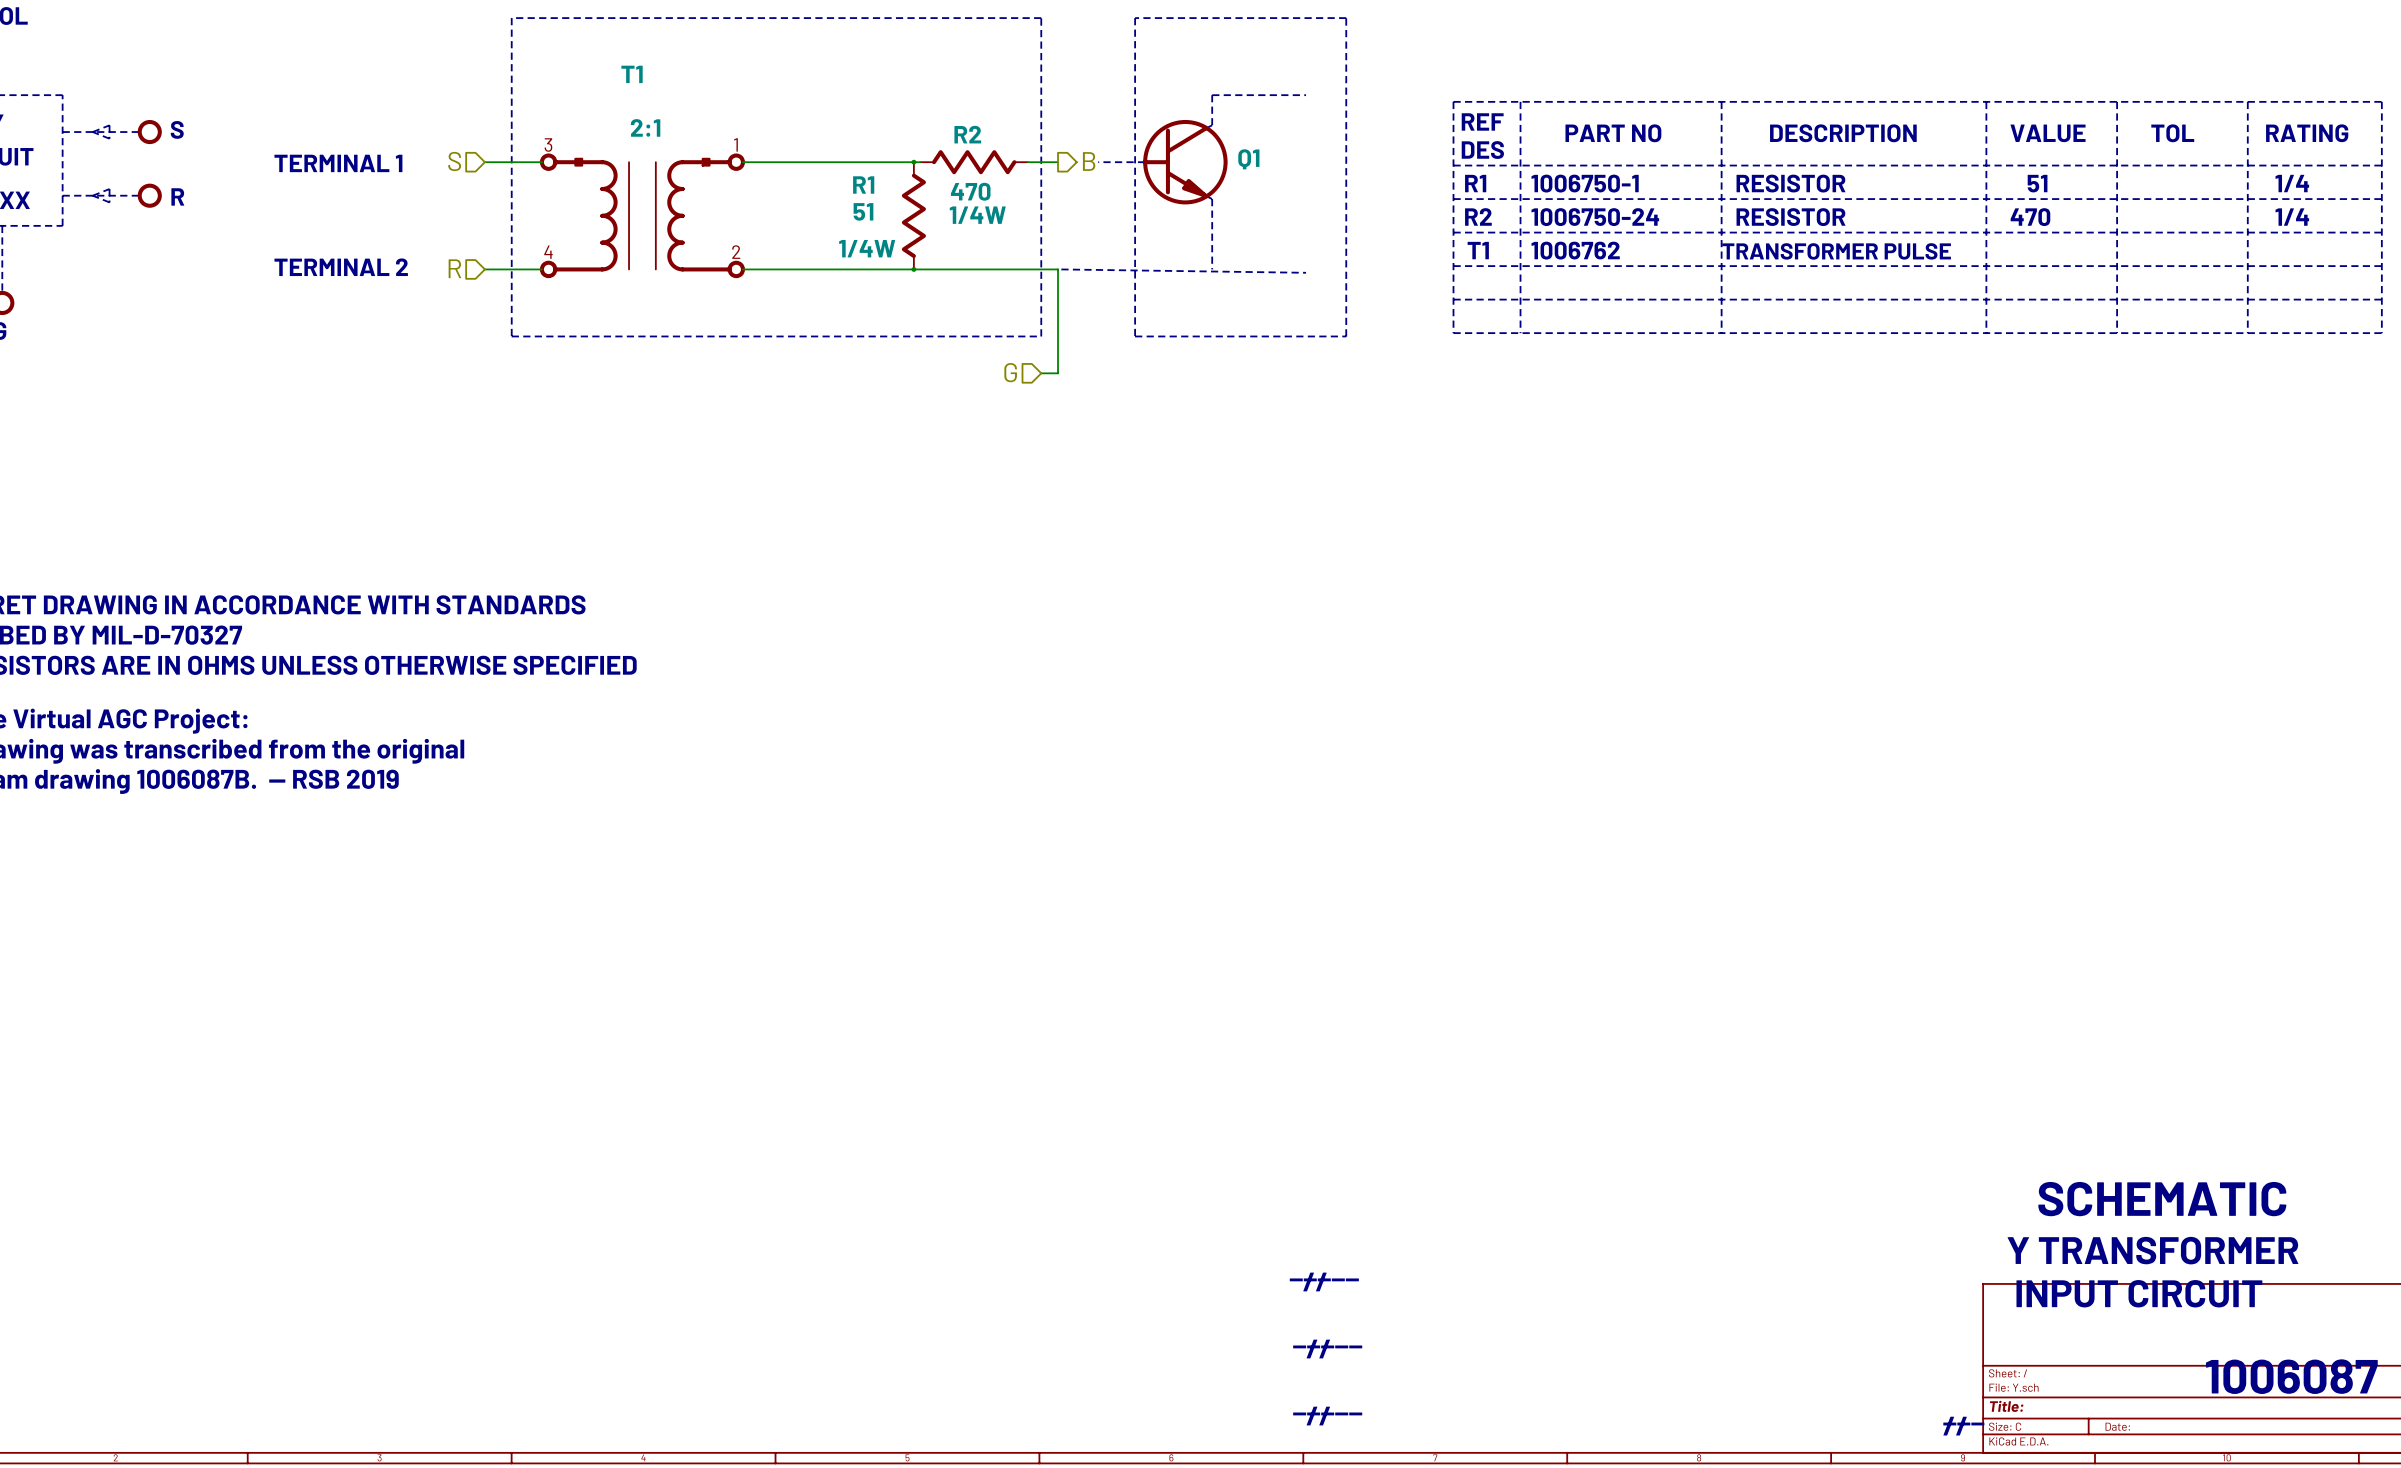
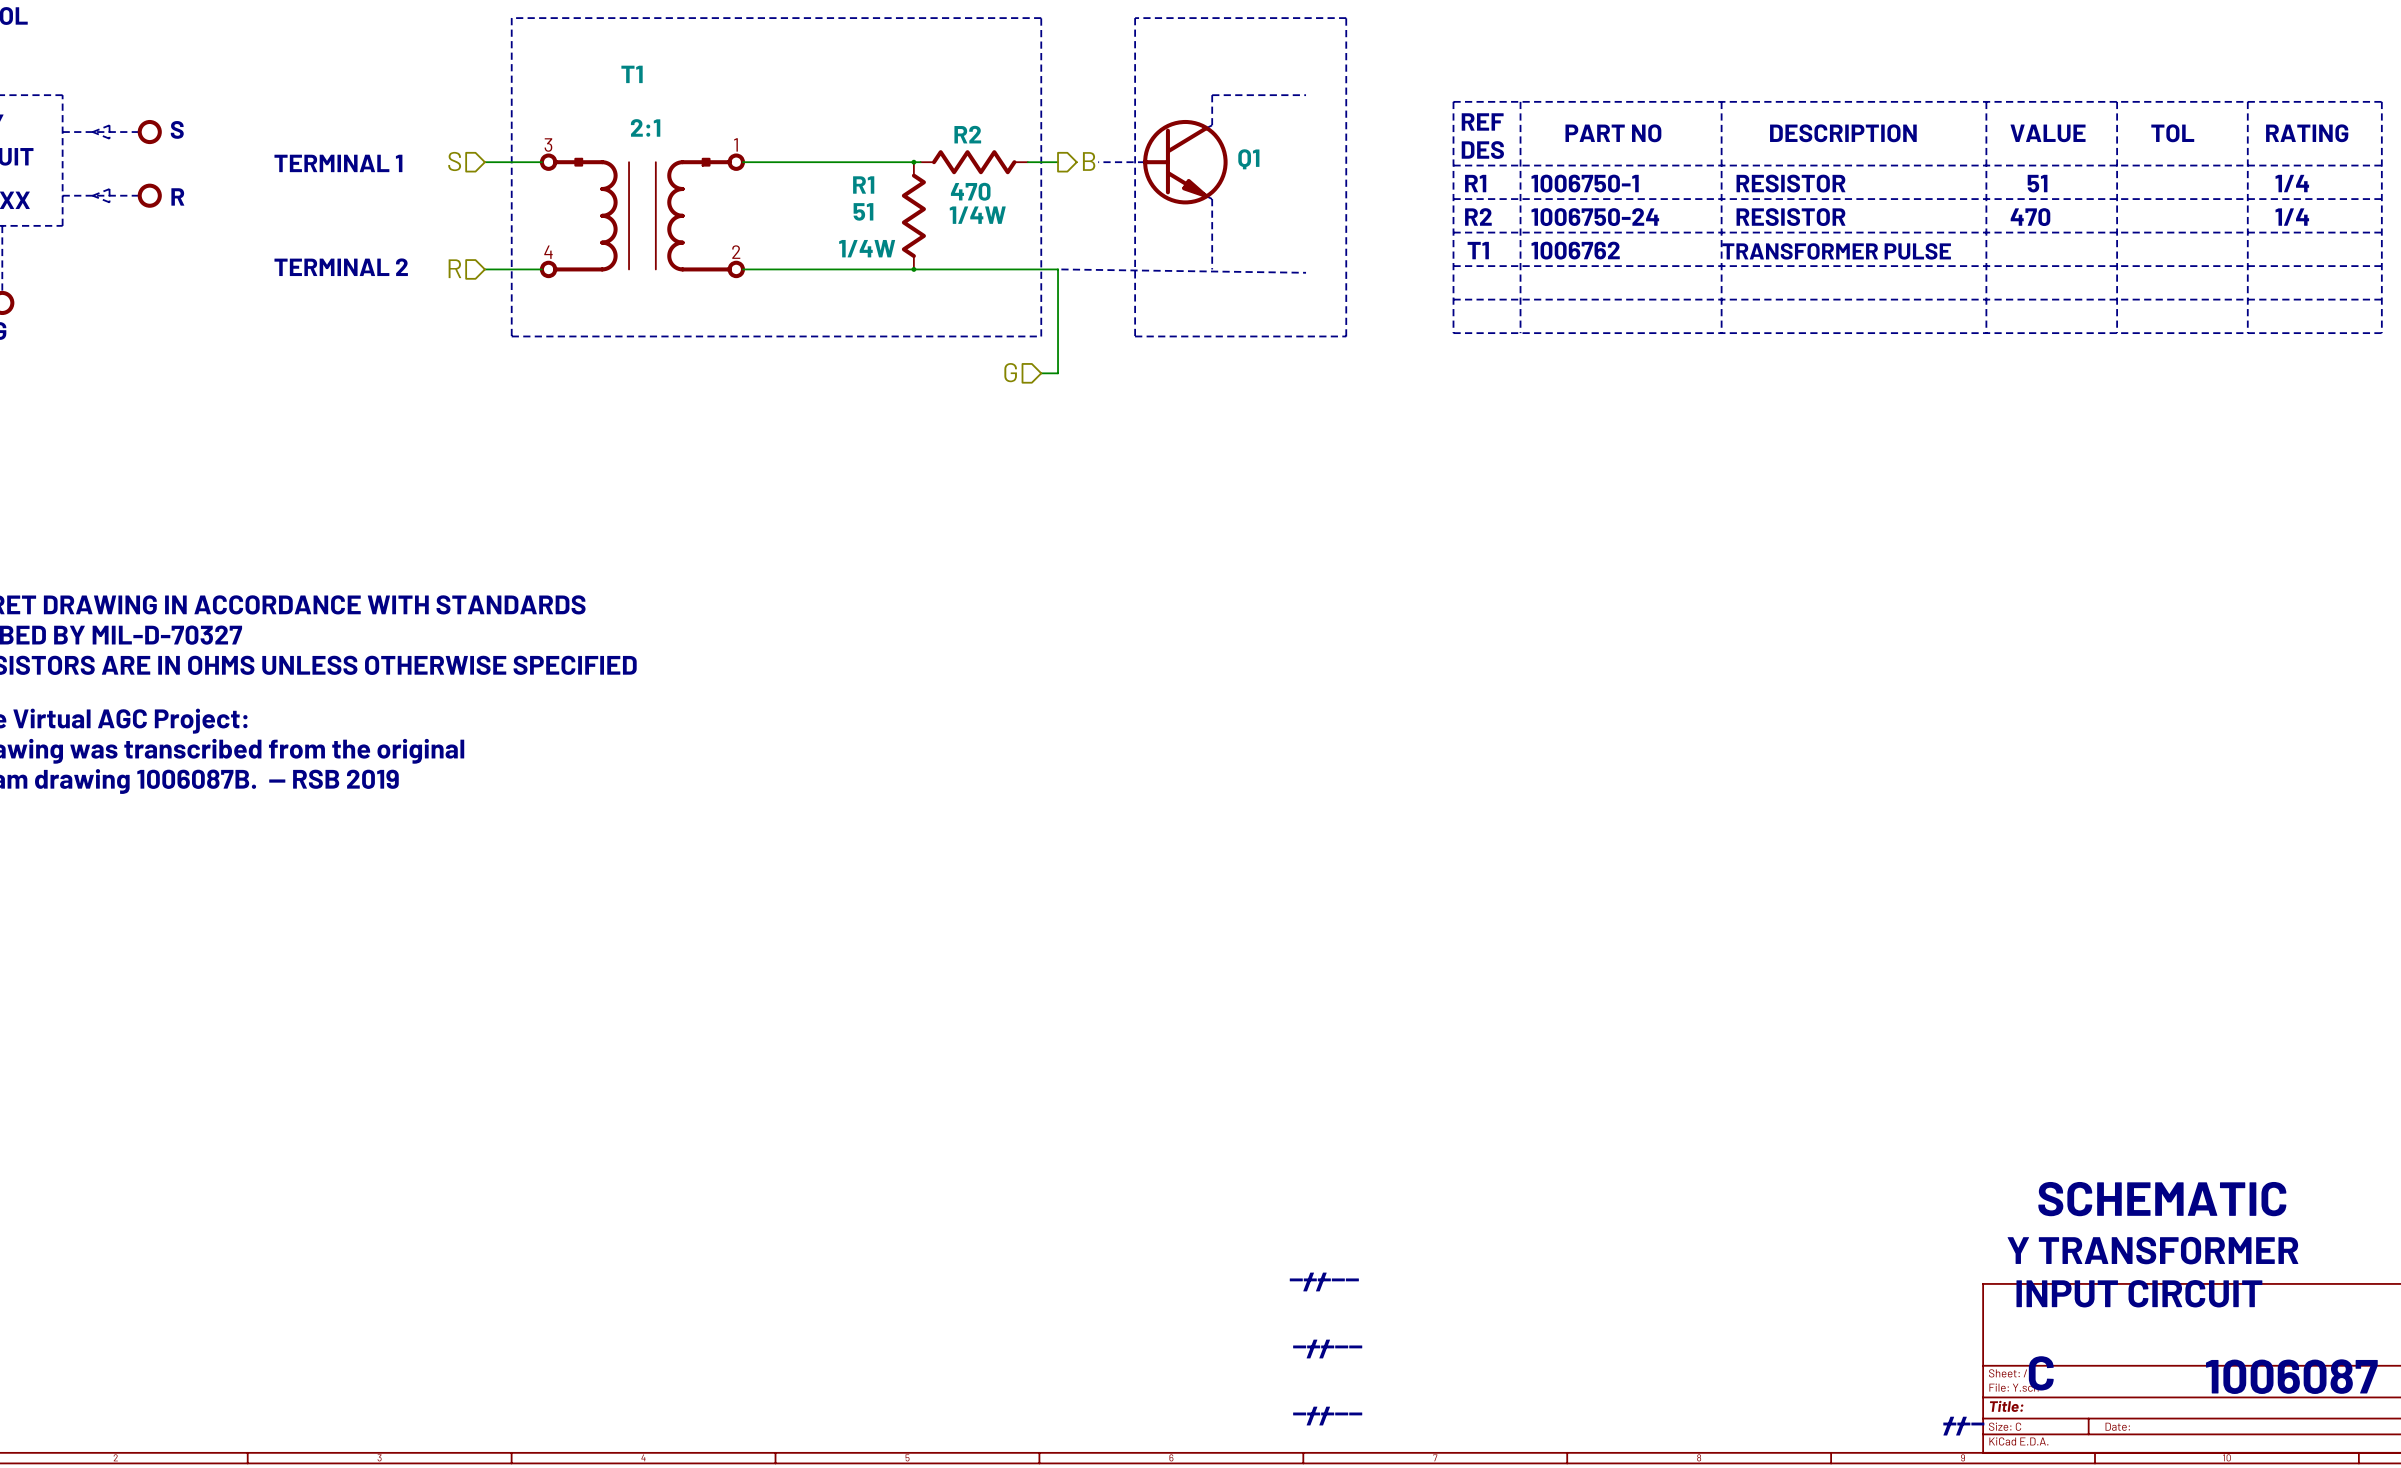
text: none -> C (2041, 1373)

